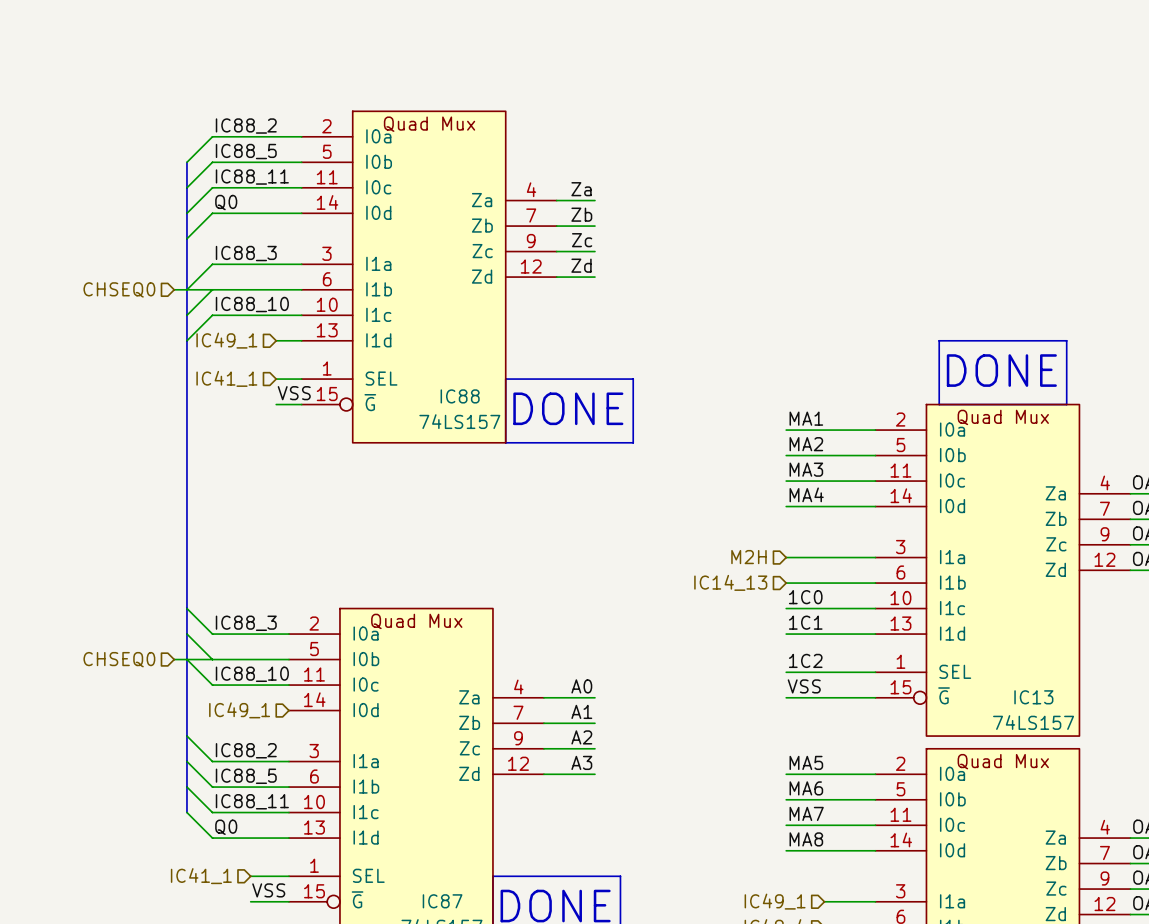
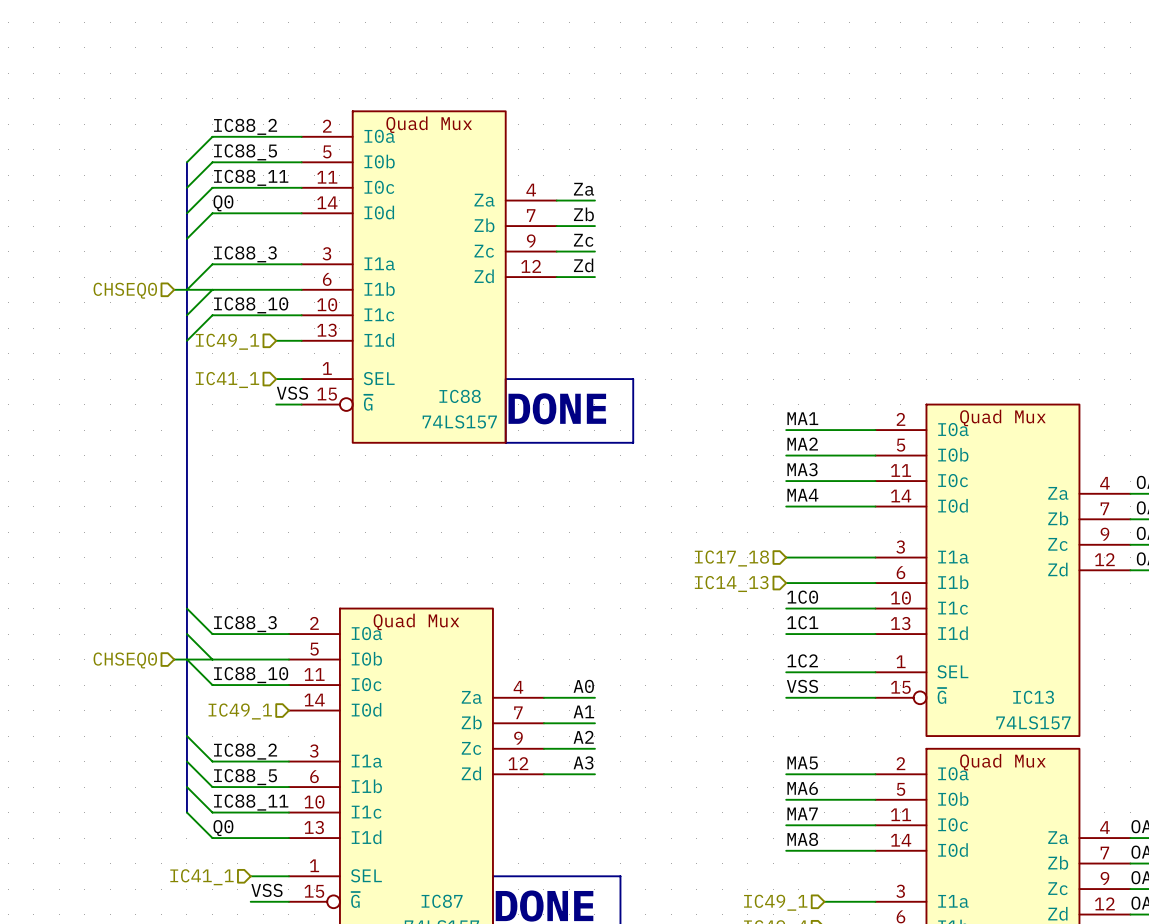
line: (939, 340) (1066, 340) (1066, 404) (939, 404) (939, 340) -> none
text: DONE (1001, 370) -> none
hierarchical label: M2H (748, 557) -> IC17_18 (731, 558)

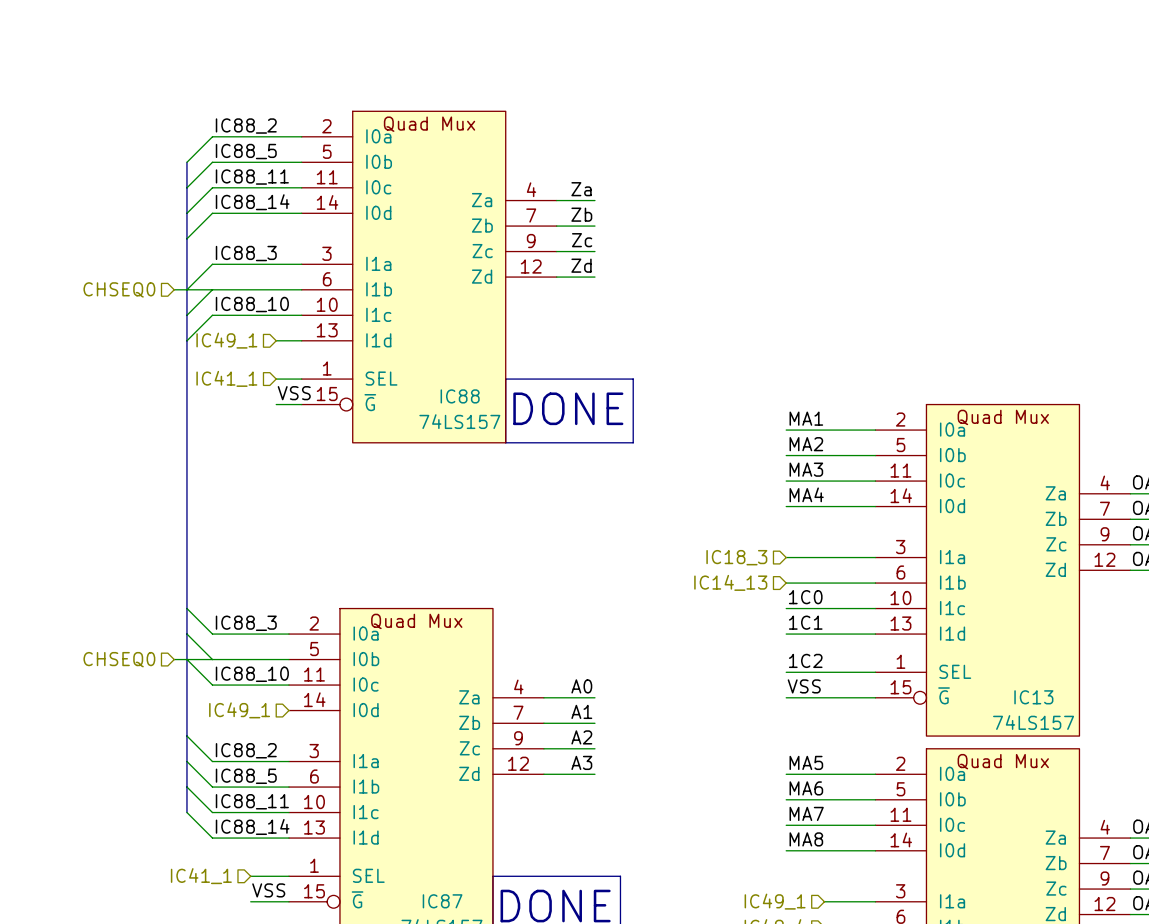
label: Q0 (223, 203) -> IC88_14 (252, 202)
hierarchical label: IC17_18 (731, 558) -> IC18_3 (736, 557)
label: Q0 (223, 828) -> IC88_14 (252, 826)

